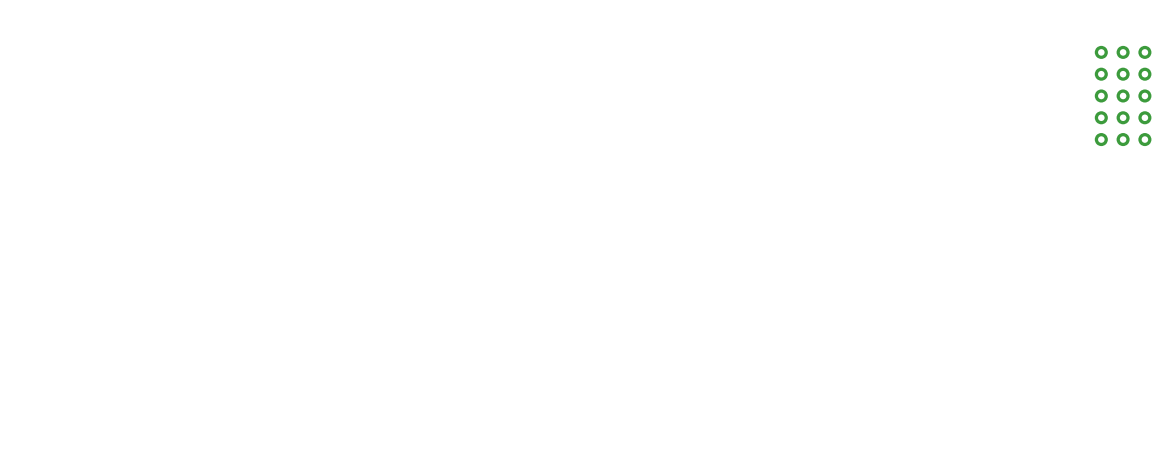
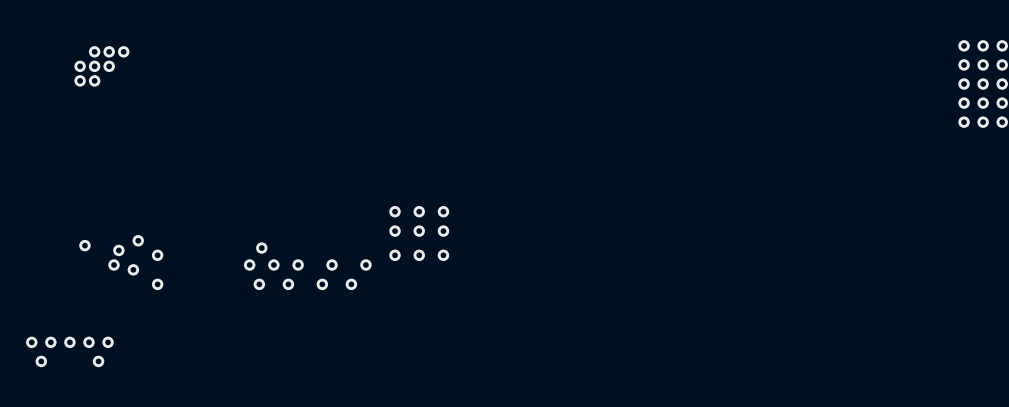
via: none -> (94, 51)
via: none -> (109, 51)
via: none -> (123, 51)
via: none -> (80, 66)
via: none -> (94, 66)
via: none -> (109, 66)
via: none -> (80, 80)
via: none -> (94, 80)
via: none -> (395, 211)
via: none -> (419, 211)
via: none -> (443, 211)
via: none -> (395, 231)
via: none -> (419, 231)
via: none -> (443, 231)
via: none -> (138, 240)
via: none -> (84, 245)
via: none -> (261, 248)
via: none -> (118, 250)
via: none -> (157, 255)
via: none -> (395, 255)
via: none -> (419, 255)
via: none -> (443, 255)
via: none -> (114, 264)
via: none -> (249, 264)
via: none -> (273, 264)
via: none -> (298, 264)
via: none -> (332, 264)
via: none -> (365, 264)
via: none -> (133, 269)
via: none -> (157, 284)
via: none -> (259, 284)
via: none -> (288, 284)
via: none -> (322, 284)
via: none -> (351, 284)
via: none -> (31, 342)
via: none -> (50, 342)
via: none -> (69, 342)
via: none -> (88, 342)
via: none -> (108, 342)
via: none -> (41, 361)
via: none -> (98, 361)

